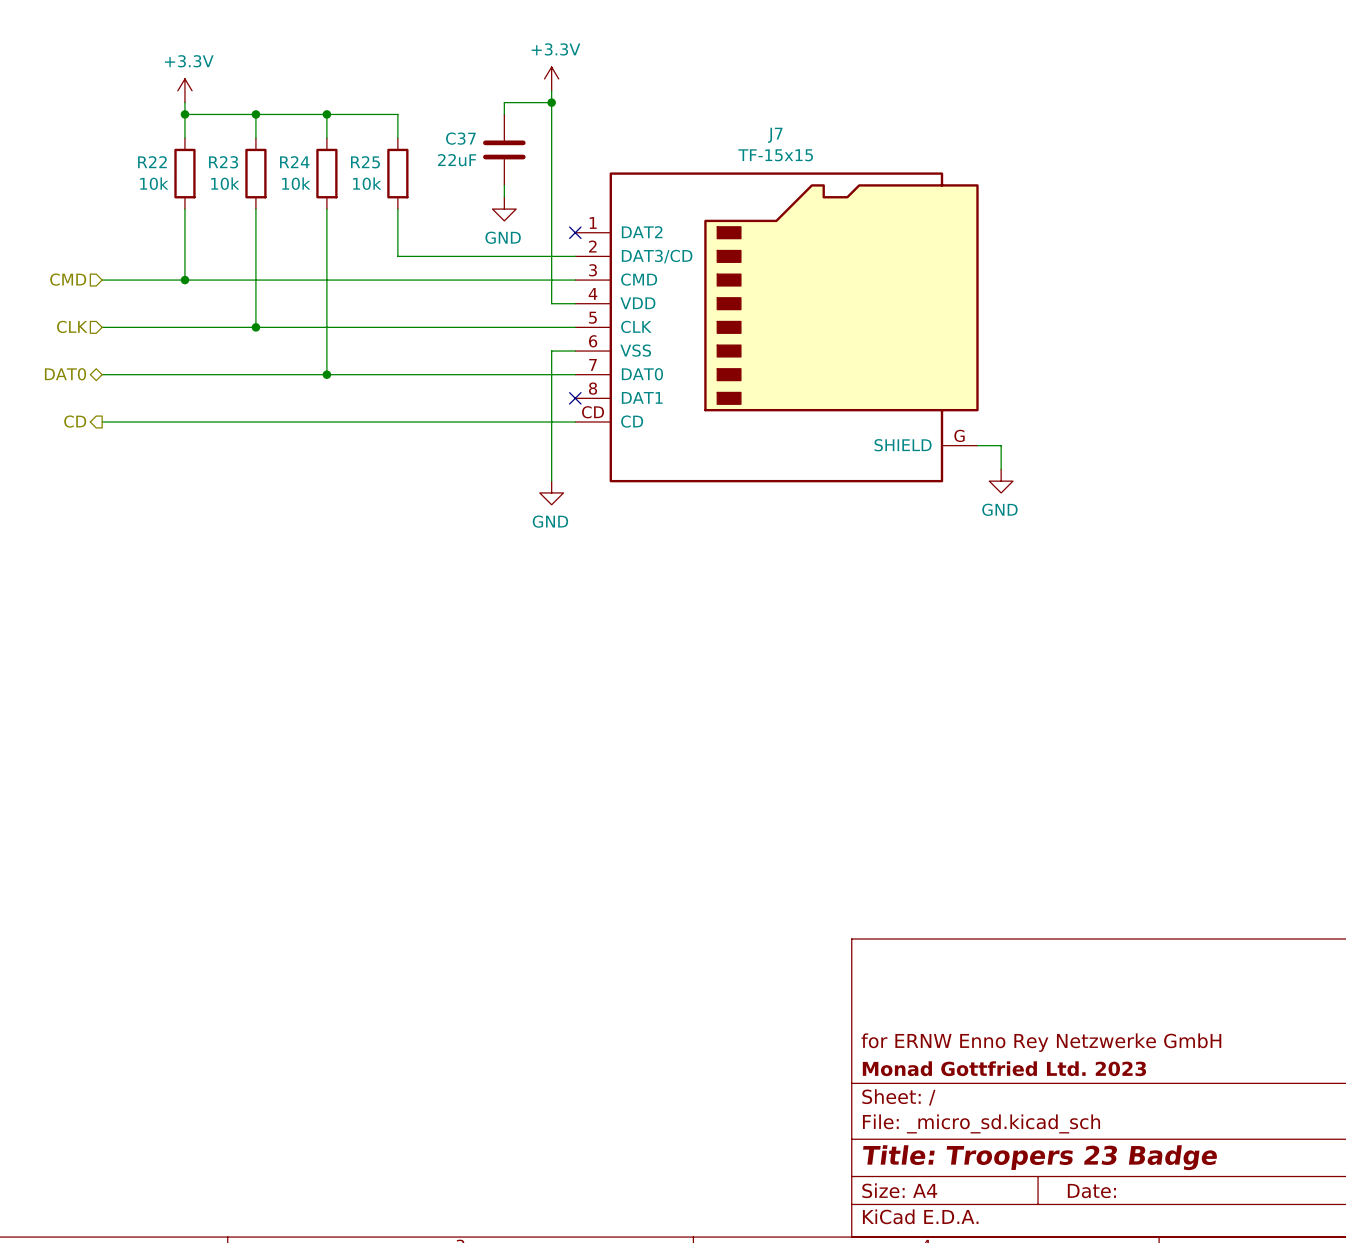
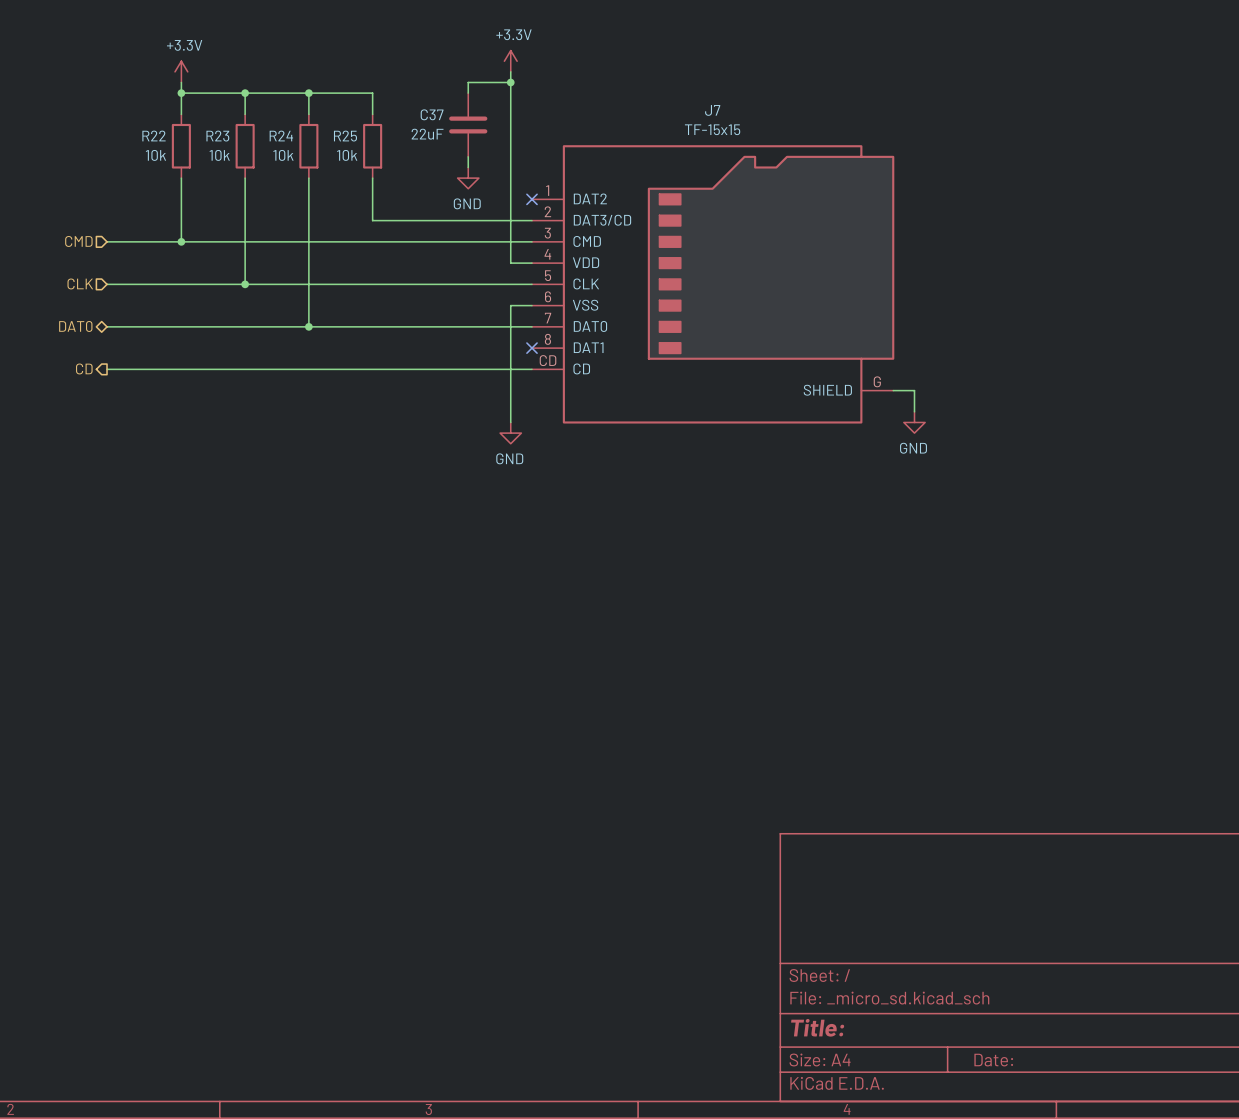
title block: for ERNW Enno Rey Netzwerke GmbH (1041, 1042) -> none
title block: Monad Gottfried Ltd. 2023 (1004, 1068) -> none
title block: Title: Troopers 23 Badge (1040, 1157) -> Title: (817, 1027)

